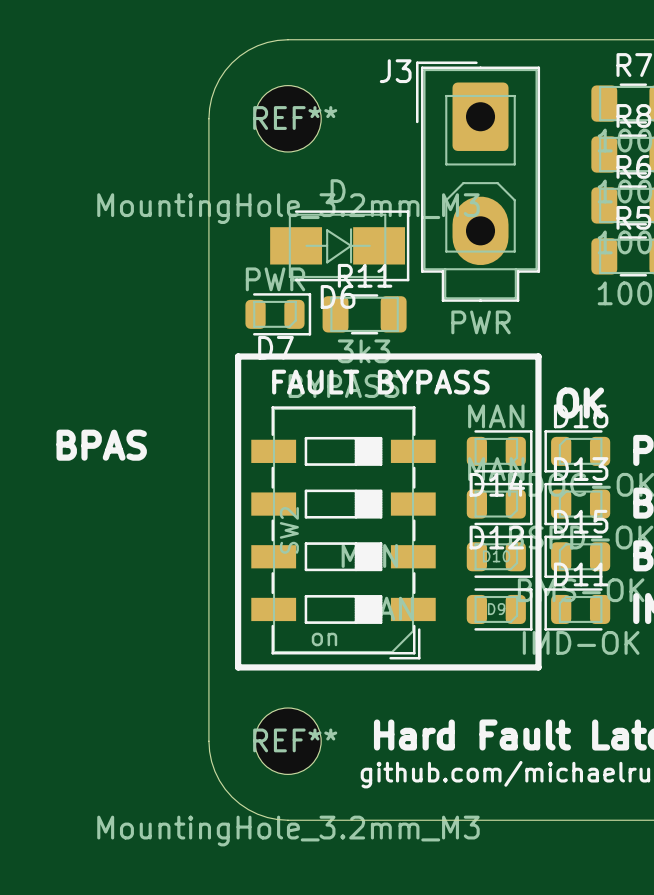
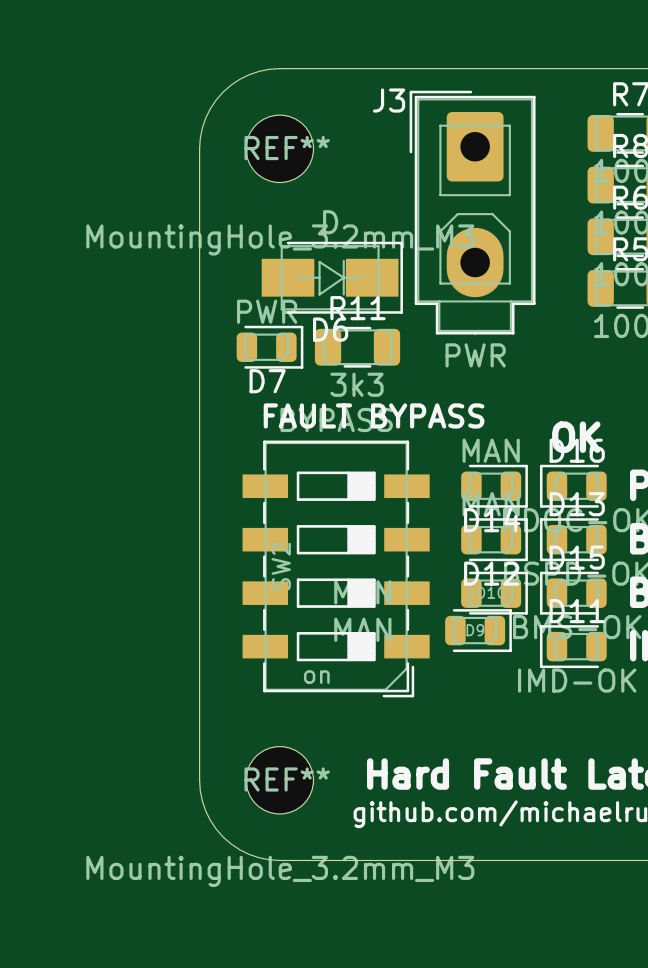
line: (238, 356) (238, 667) (538, 667) (538, 356) (238, 356) -> none
text: BPAS (101, 445) -> none
D9 position: (499, 609) -> (478, 630)

